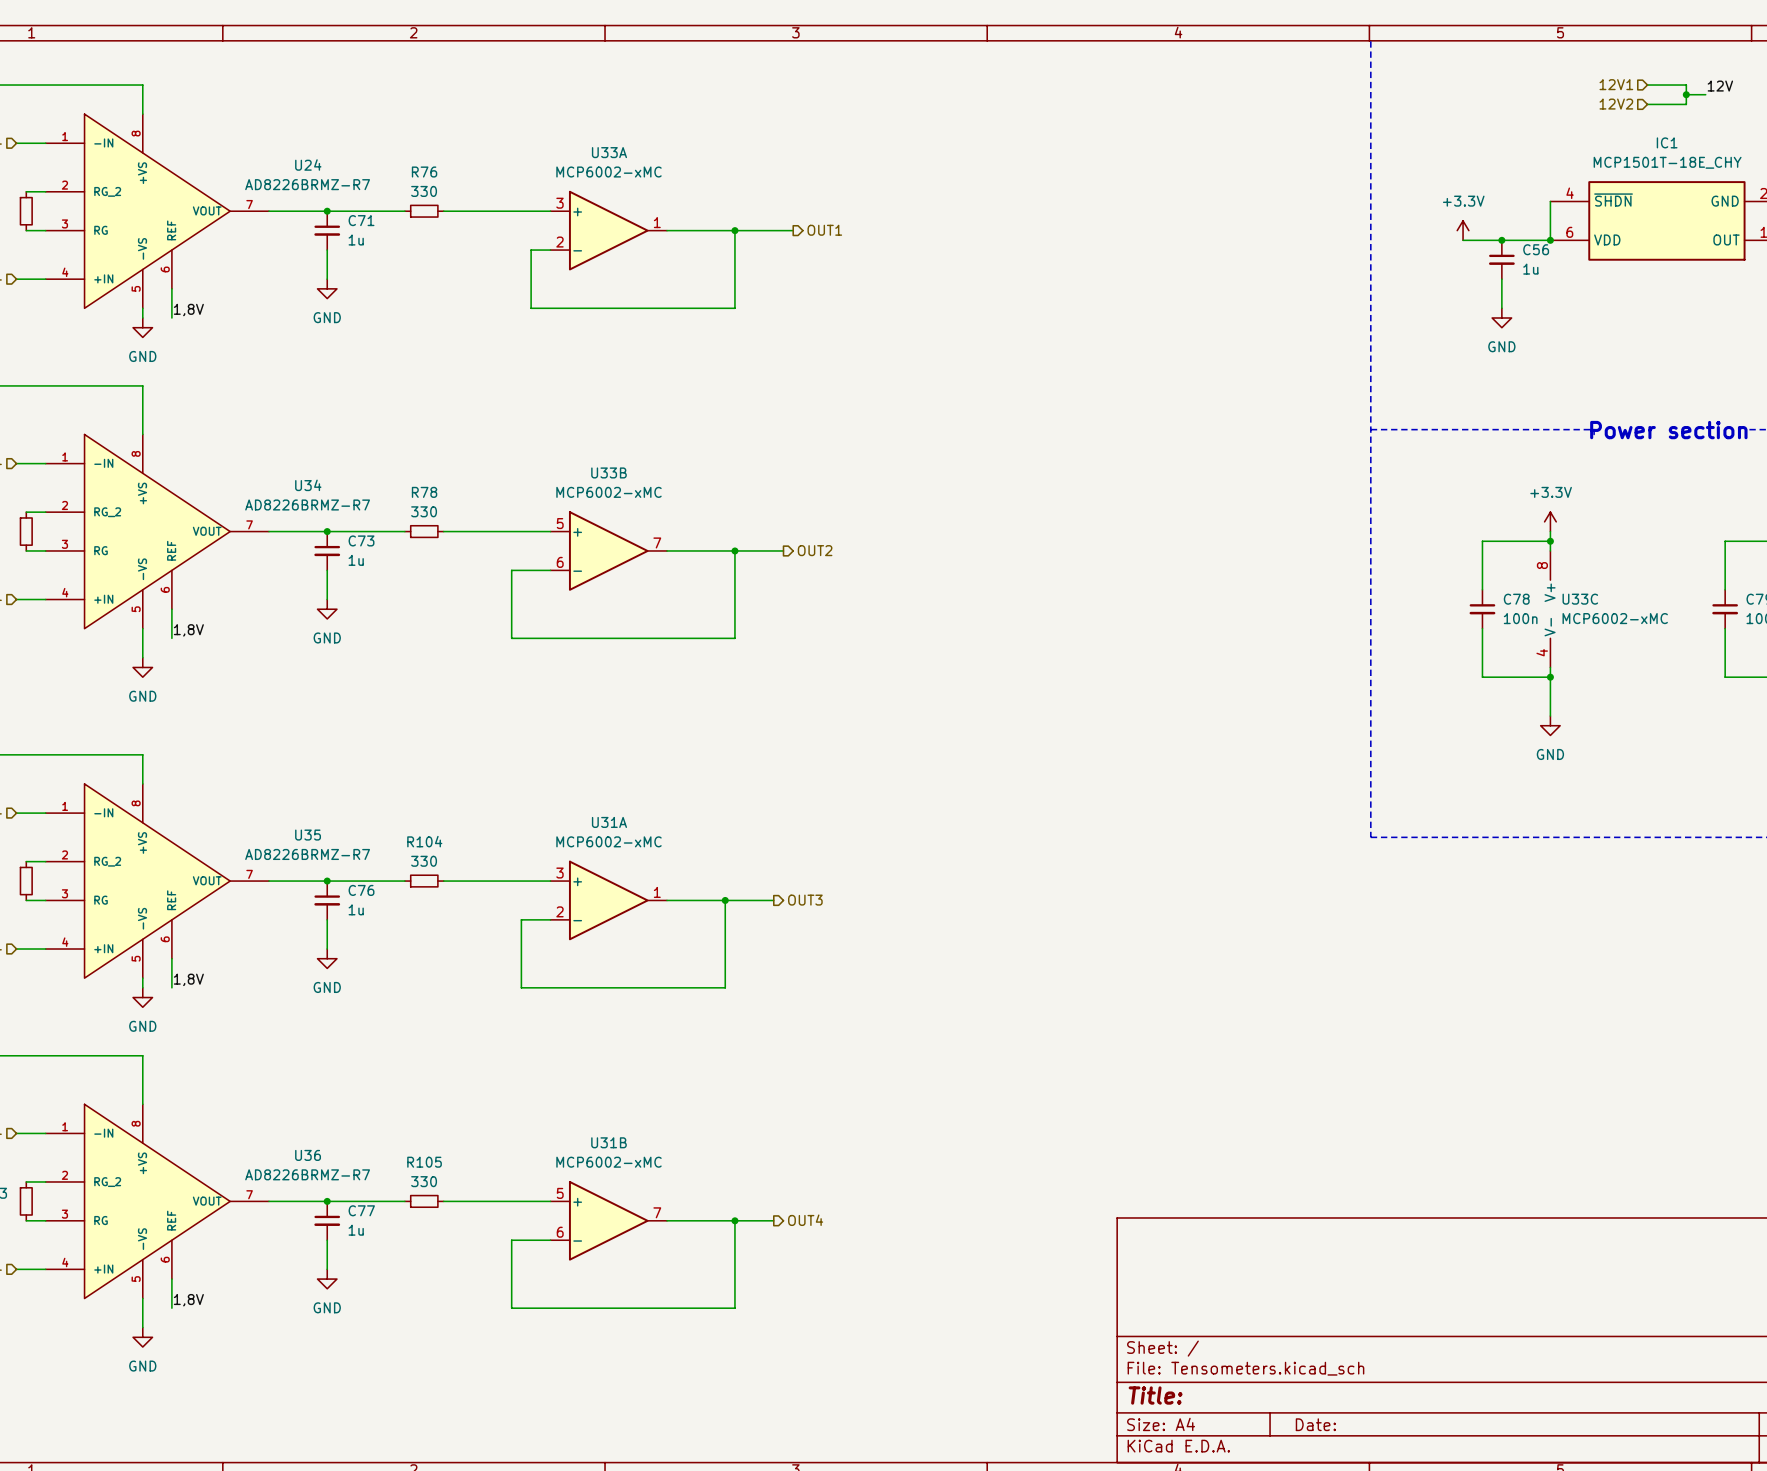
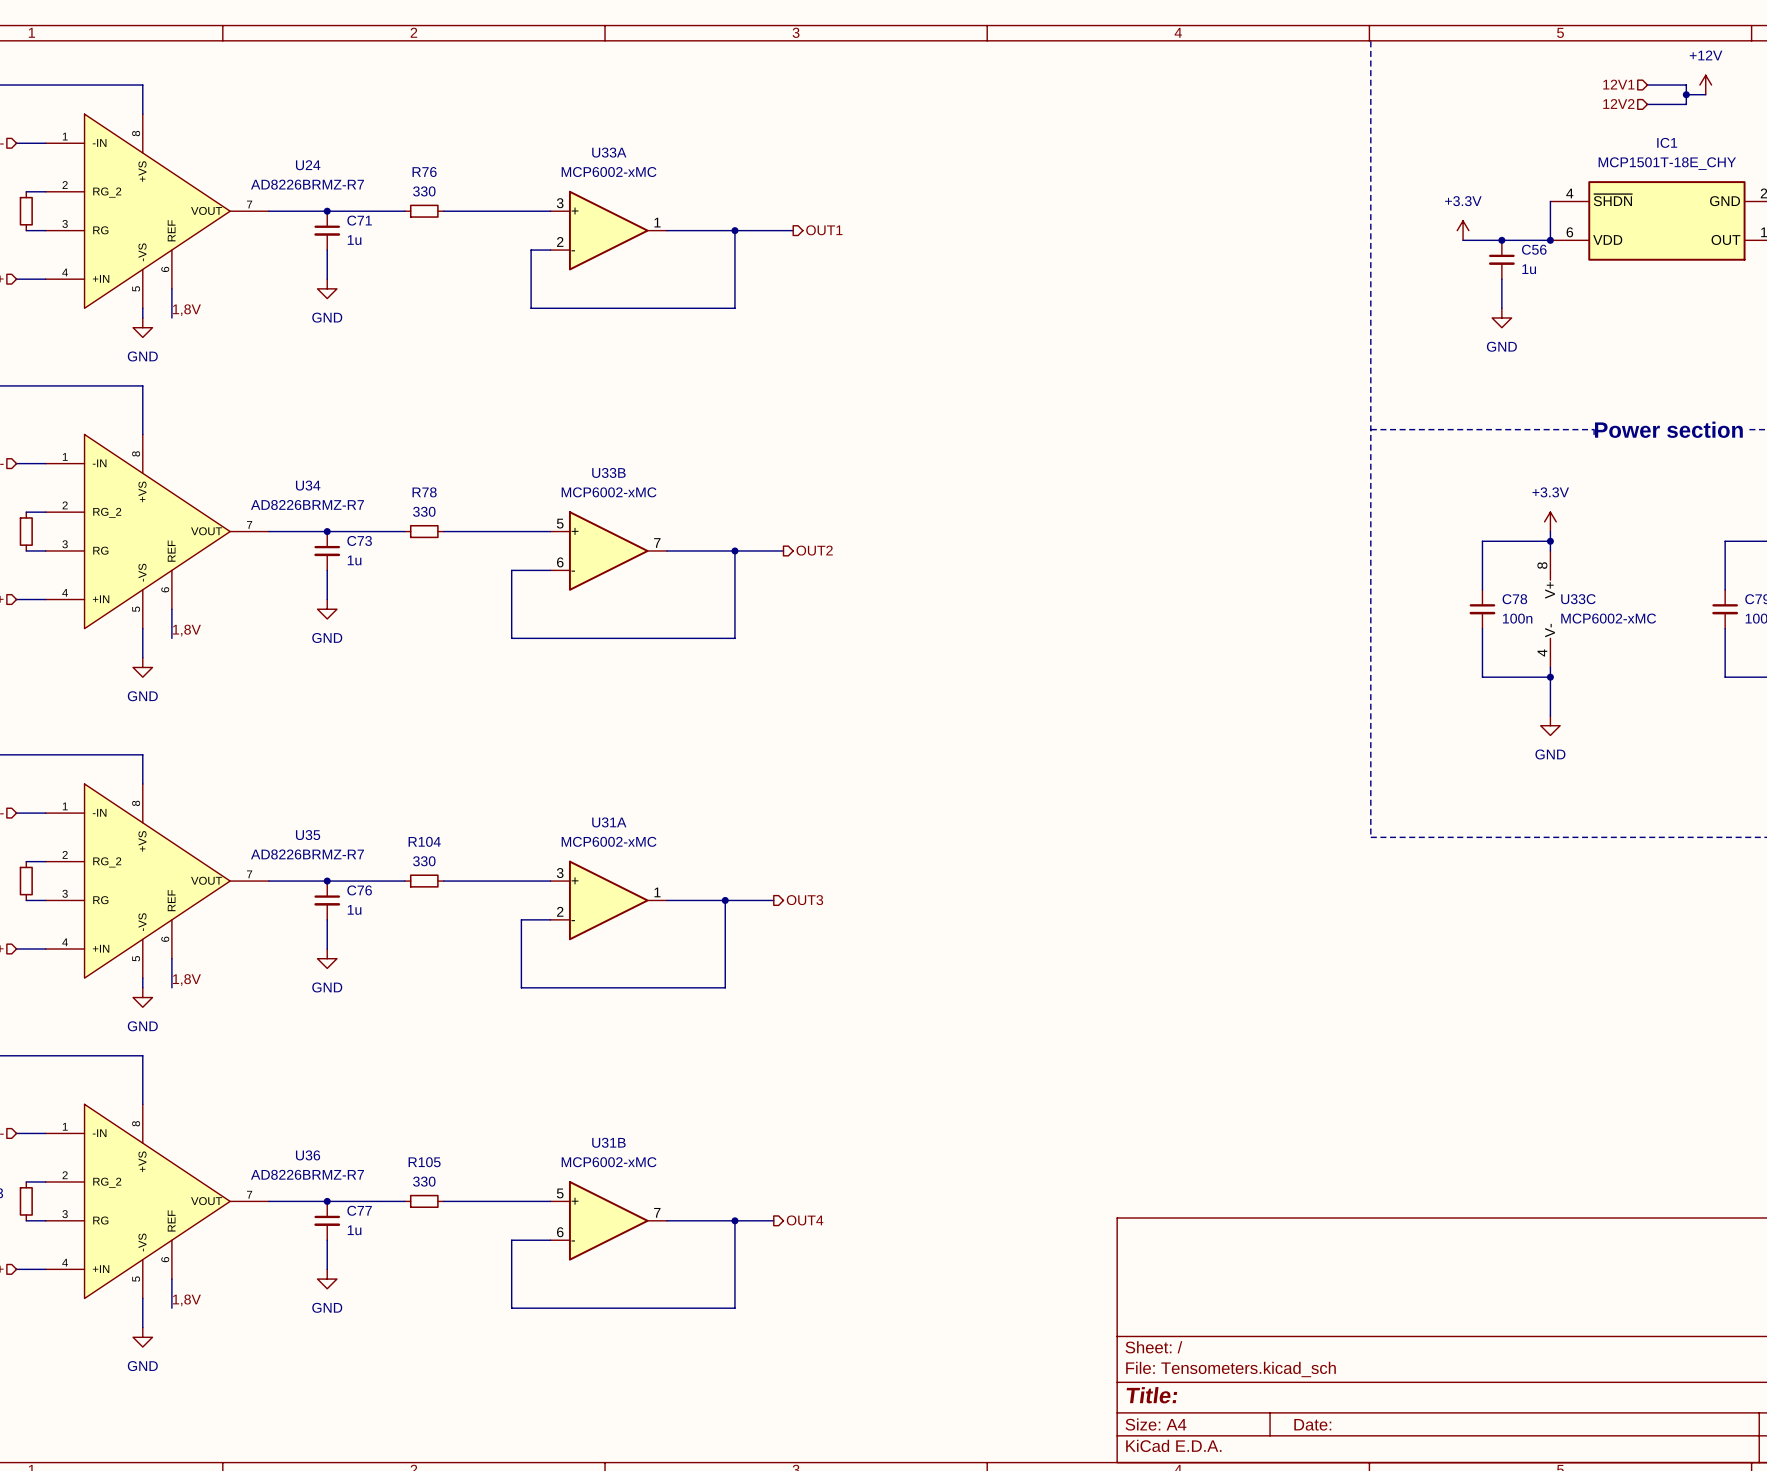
power symbol: none -> +12V (1705, 85)
label: 12V (1720, 86) -> none

